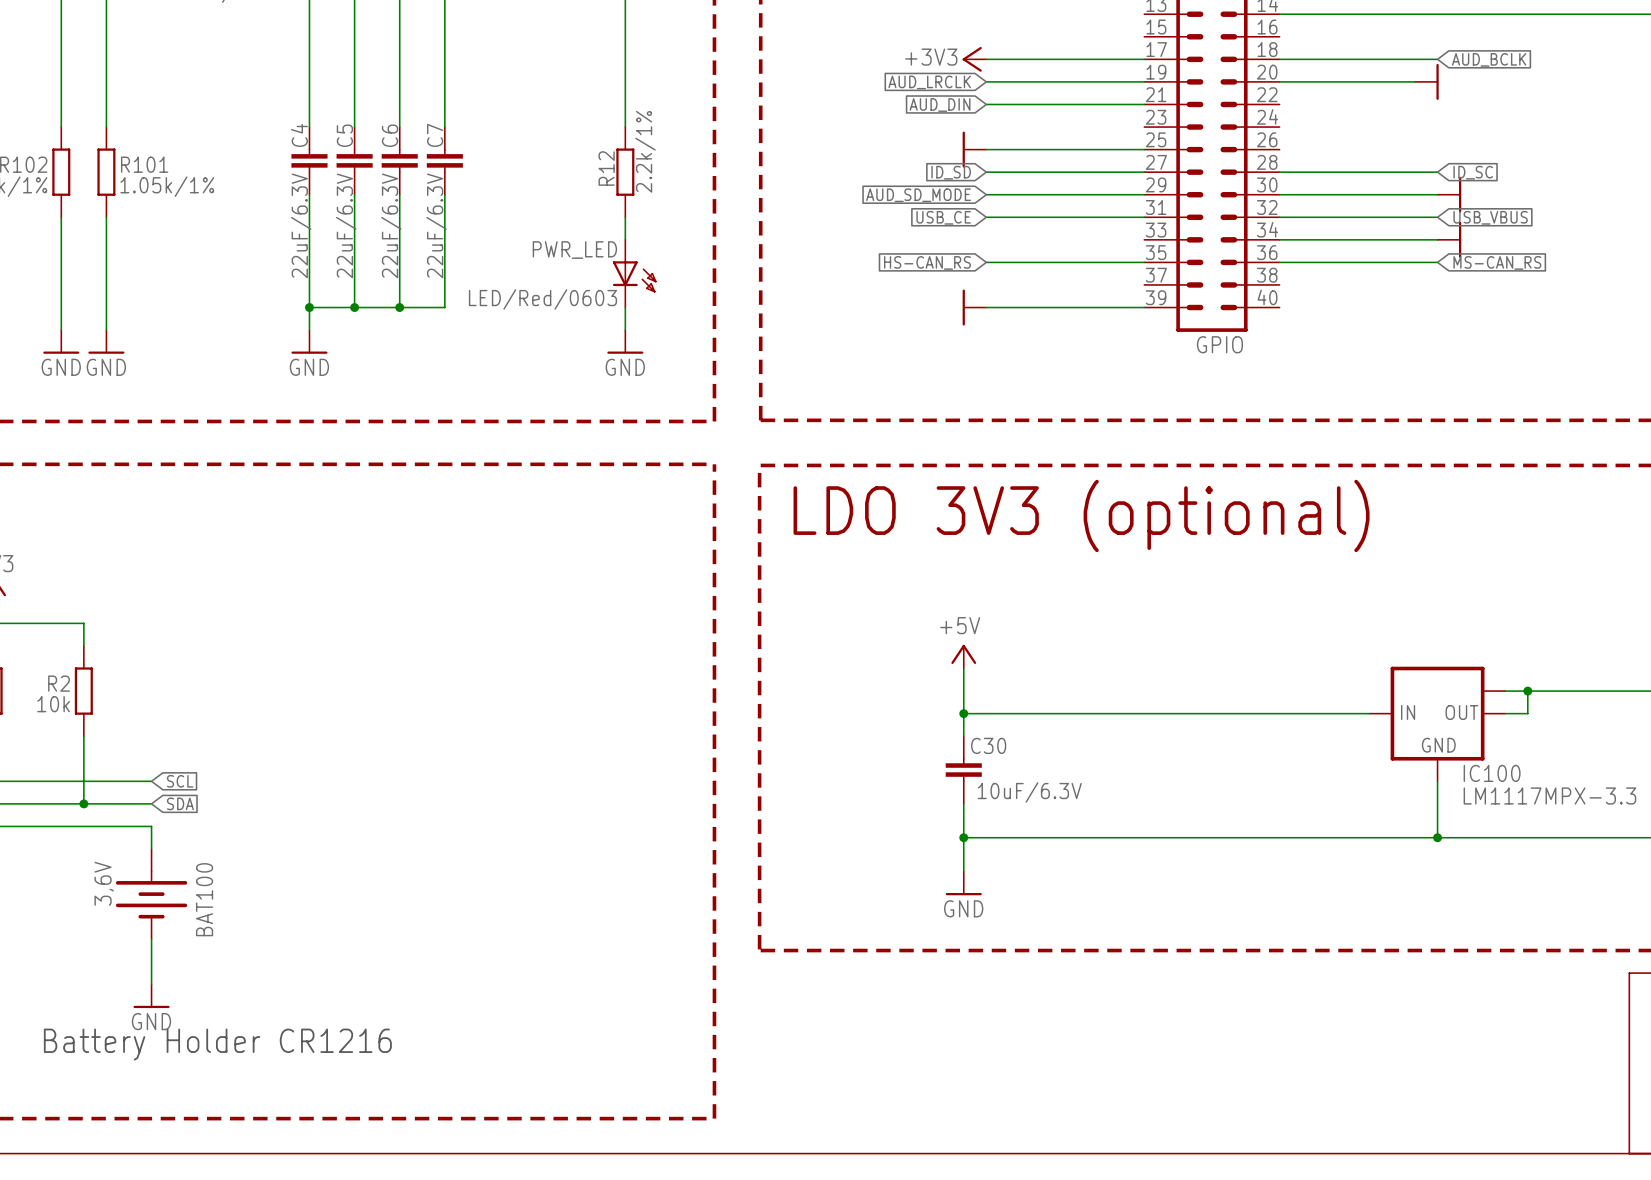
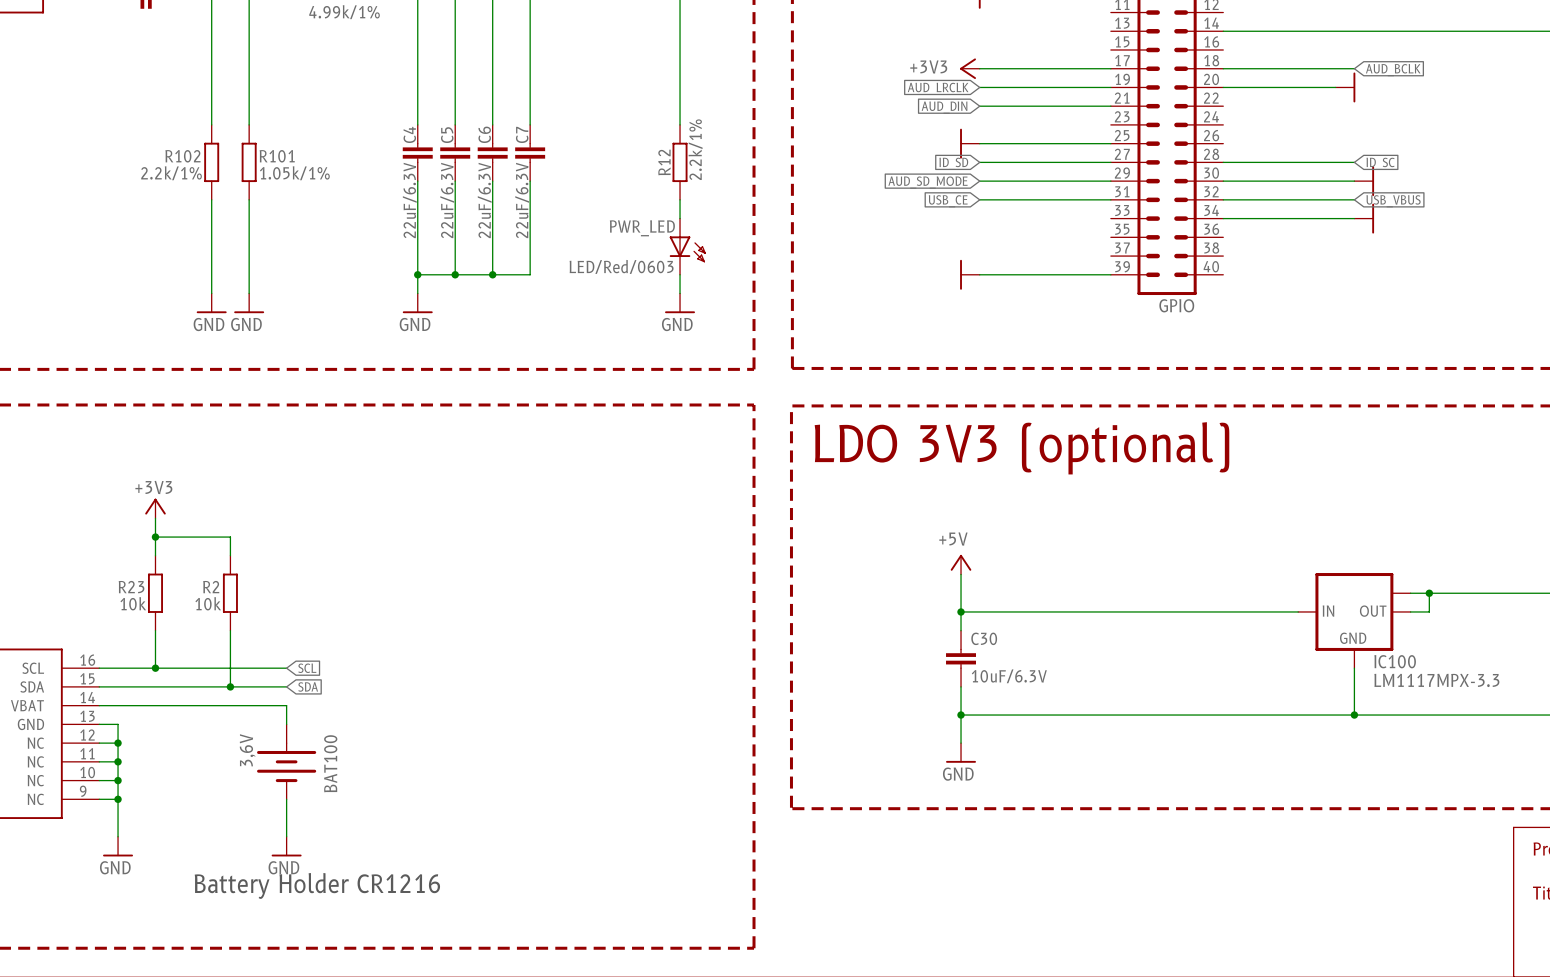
global label: HS-CAN_RS (927, 262) -> none
wire: (986, 262) (1144, 262) -> none
wire: (1279, 262) (1437, 262) -> none
global label: MS-CAN_RS (1497, 262) -> none

